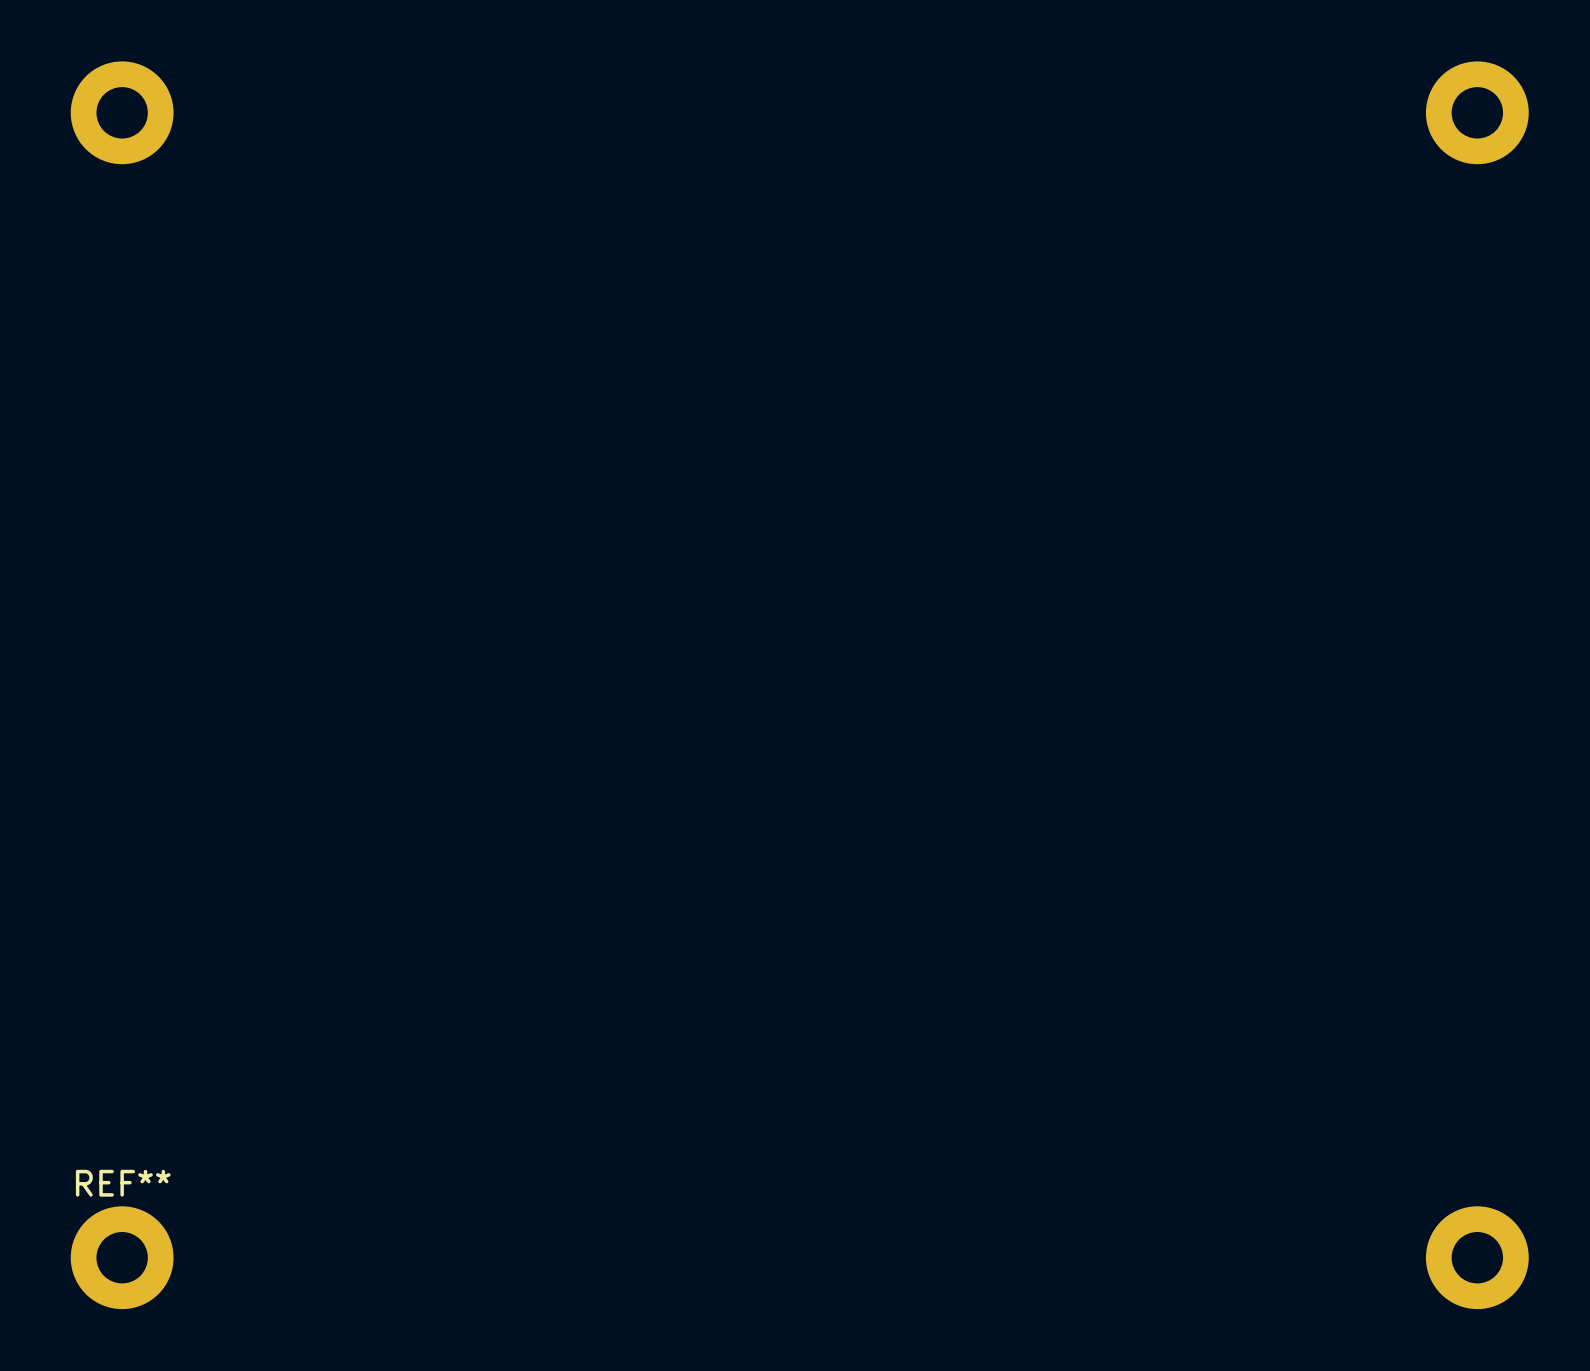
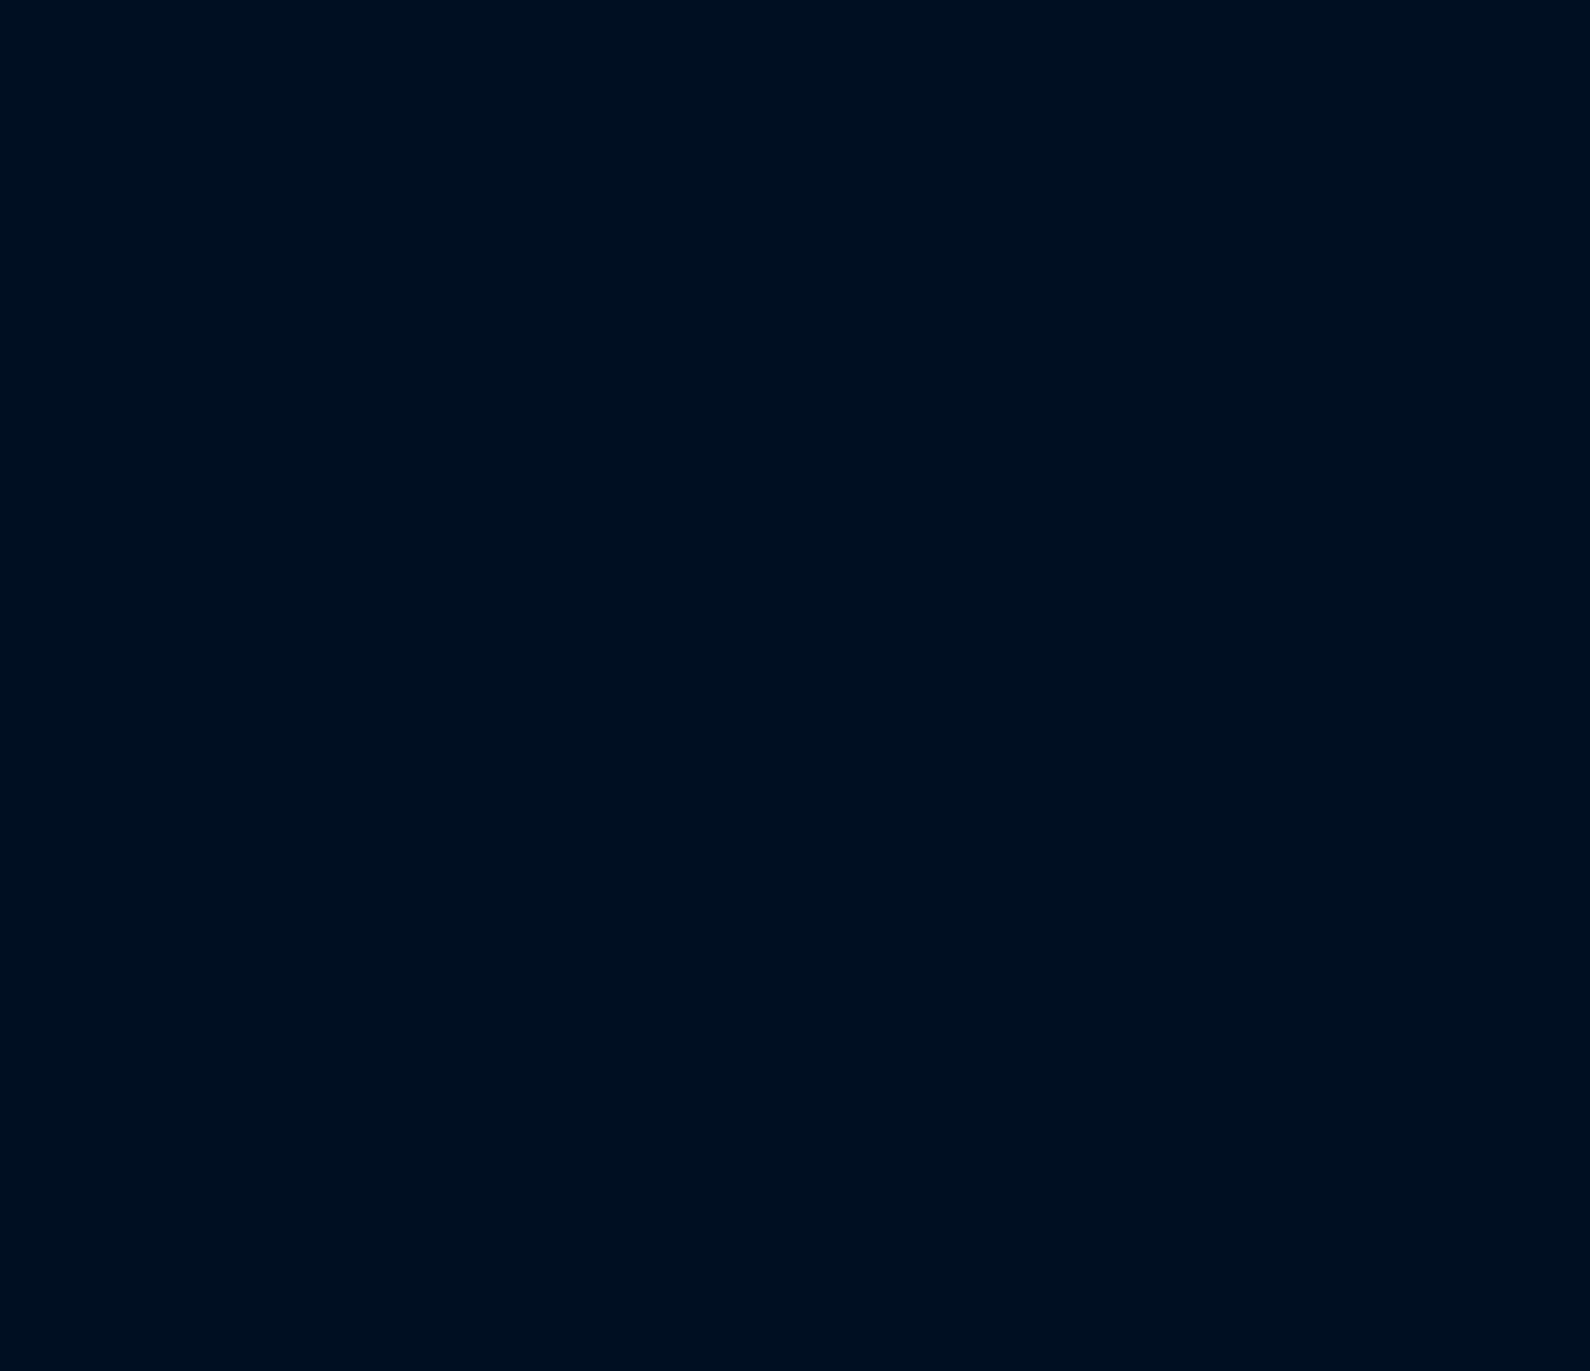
REF**: (799, 685) -> none

